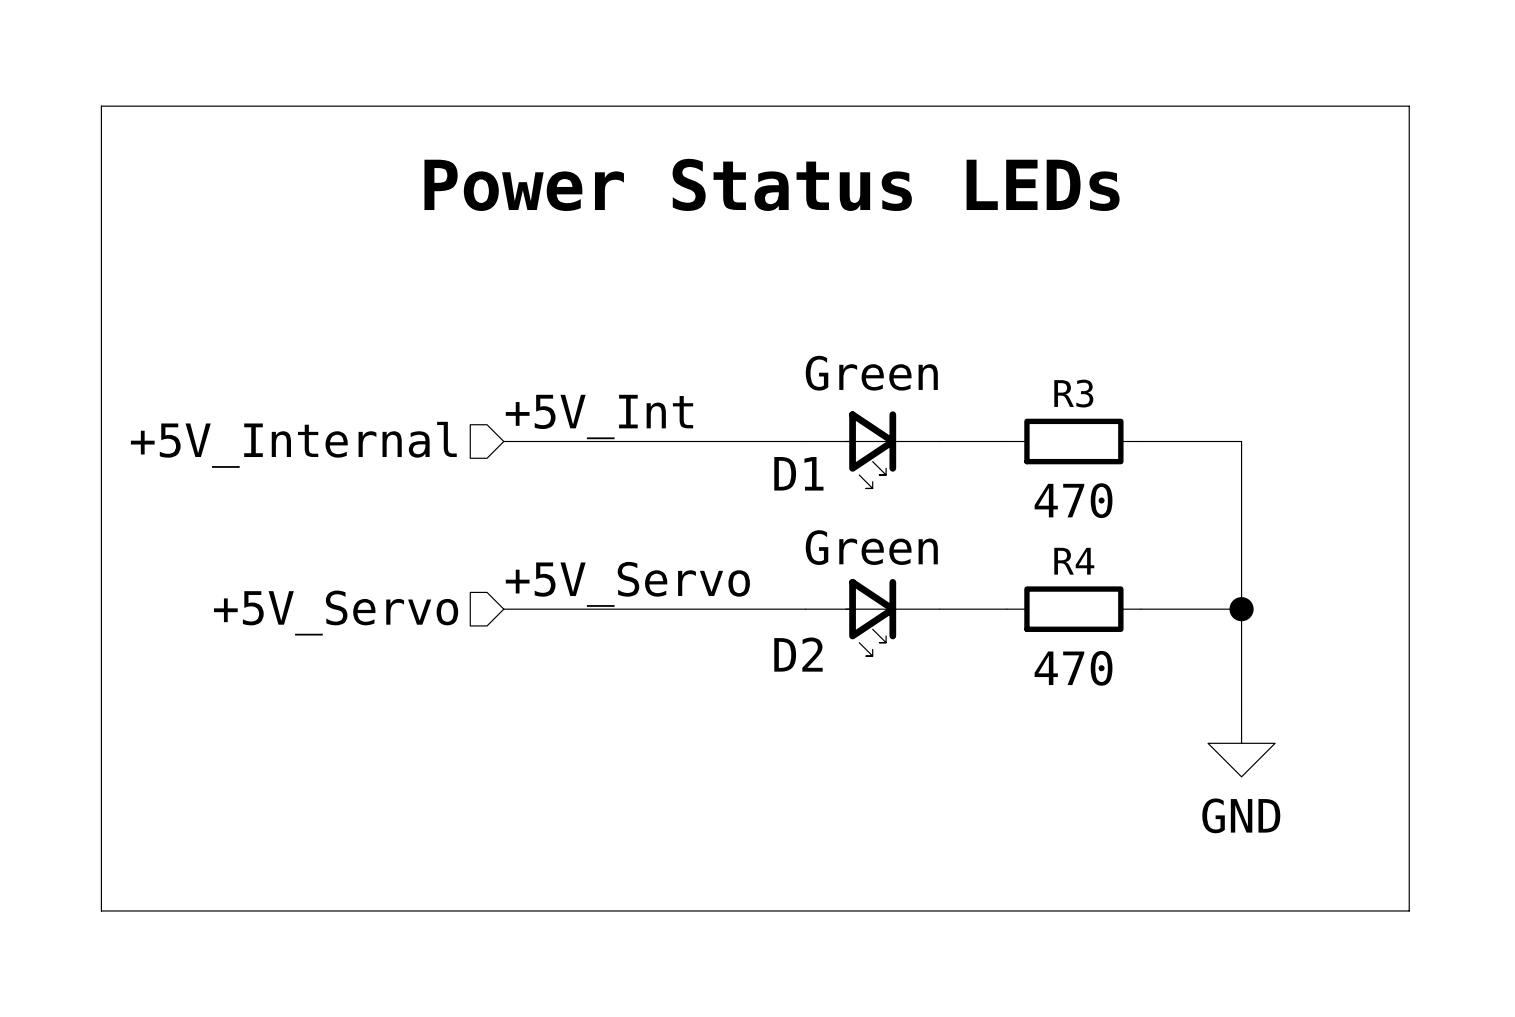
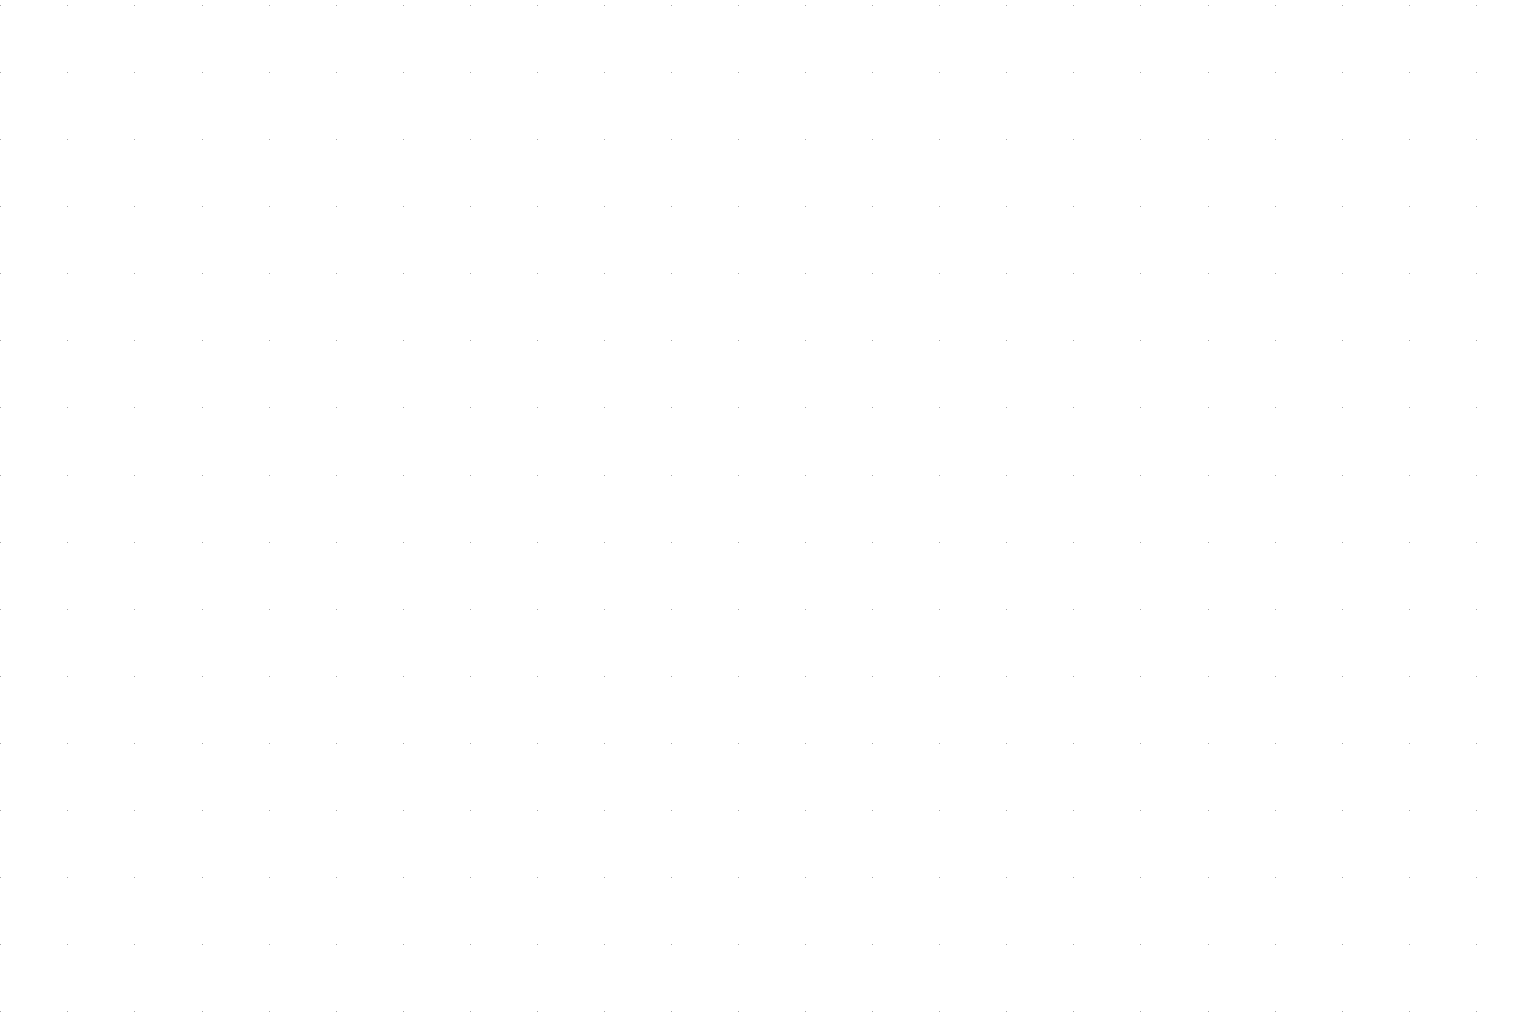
line: (101, 106) (1409, 106) (1409, 910) (101, 910) (101, 106) -> none
text: Power Status LEDs (772, 184) -> none
label: +5V_Int (599, 417) -> none
wire: (503, 441) (805, 441) -> none
wire: (939, 441) (1006, 441) -> none
R3: 470 (1073, 441) -> none
wire: (1140, 441) (1241, 441) (1241, 709) -> none
hierarchical label: +5V_Internal (293, 444) -> none
D1: Green (872, 449) -> none
label: +5V_Servo (627, 584) -> none
wire: (503, 609) (805, 609) -> none
wire: (939, 609) (1006, 609) -> none
R4: 470 (1073, 609) -> none
wire: (1140, 609) (1241, 609) -> none
junction: (1241, 609) -> none
hierarchical label: +5V_Servo (336, 613) -> none
D2: Green (872, 617) -> none
power symbol: GND (1241, 743) -> none

